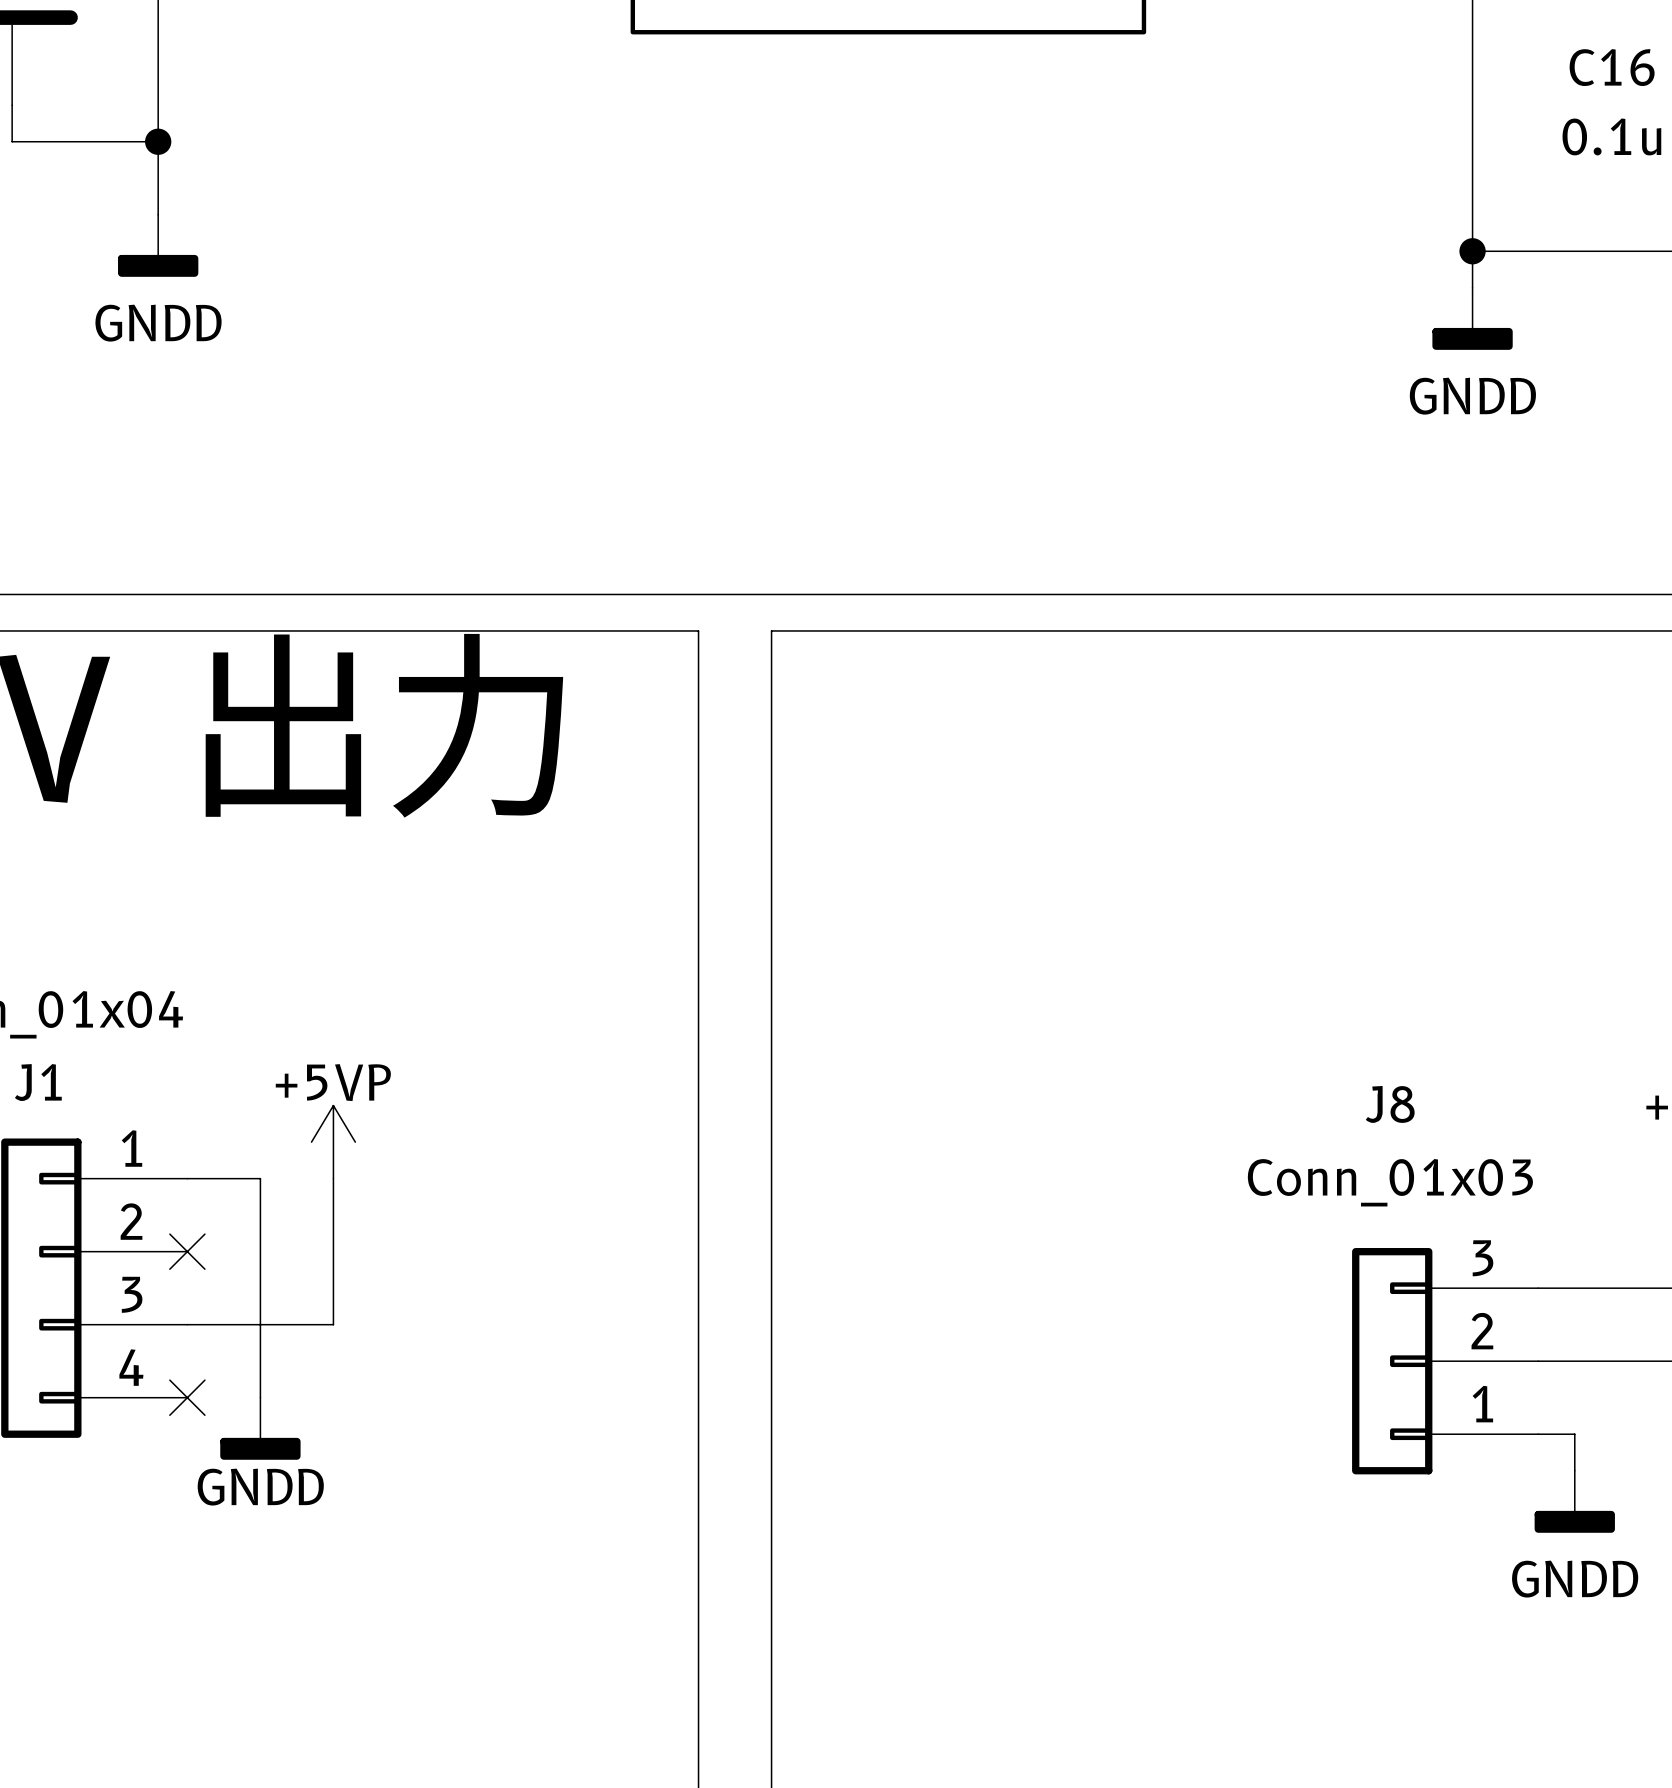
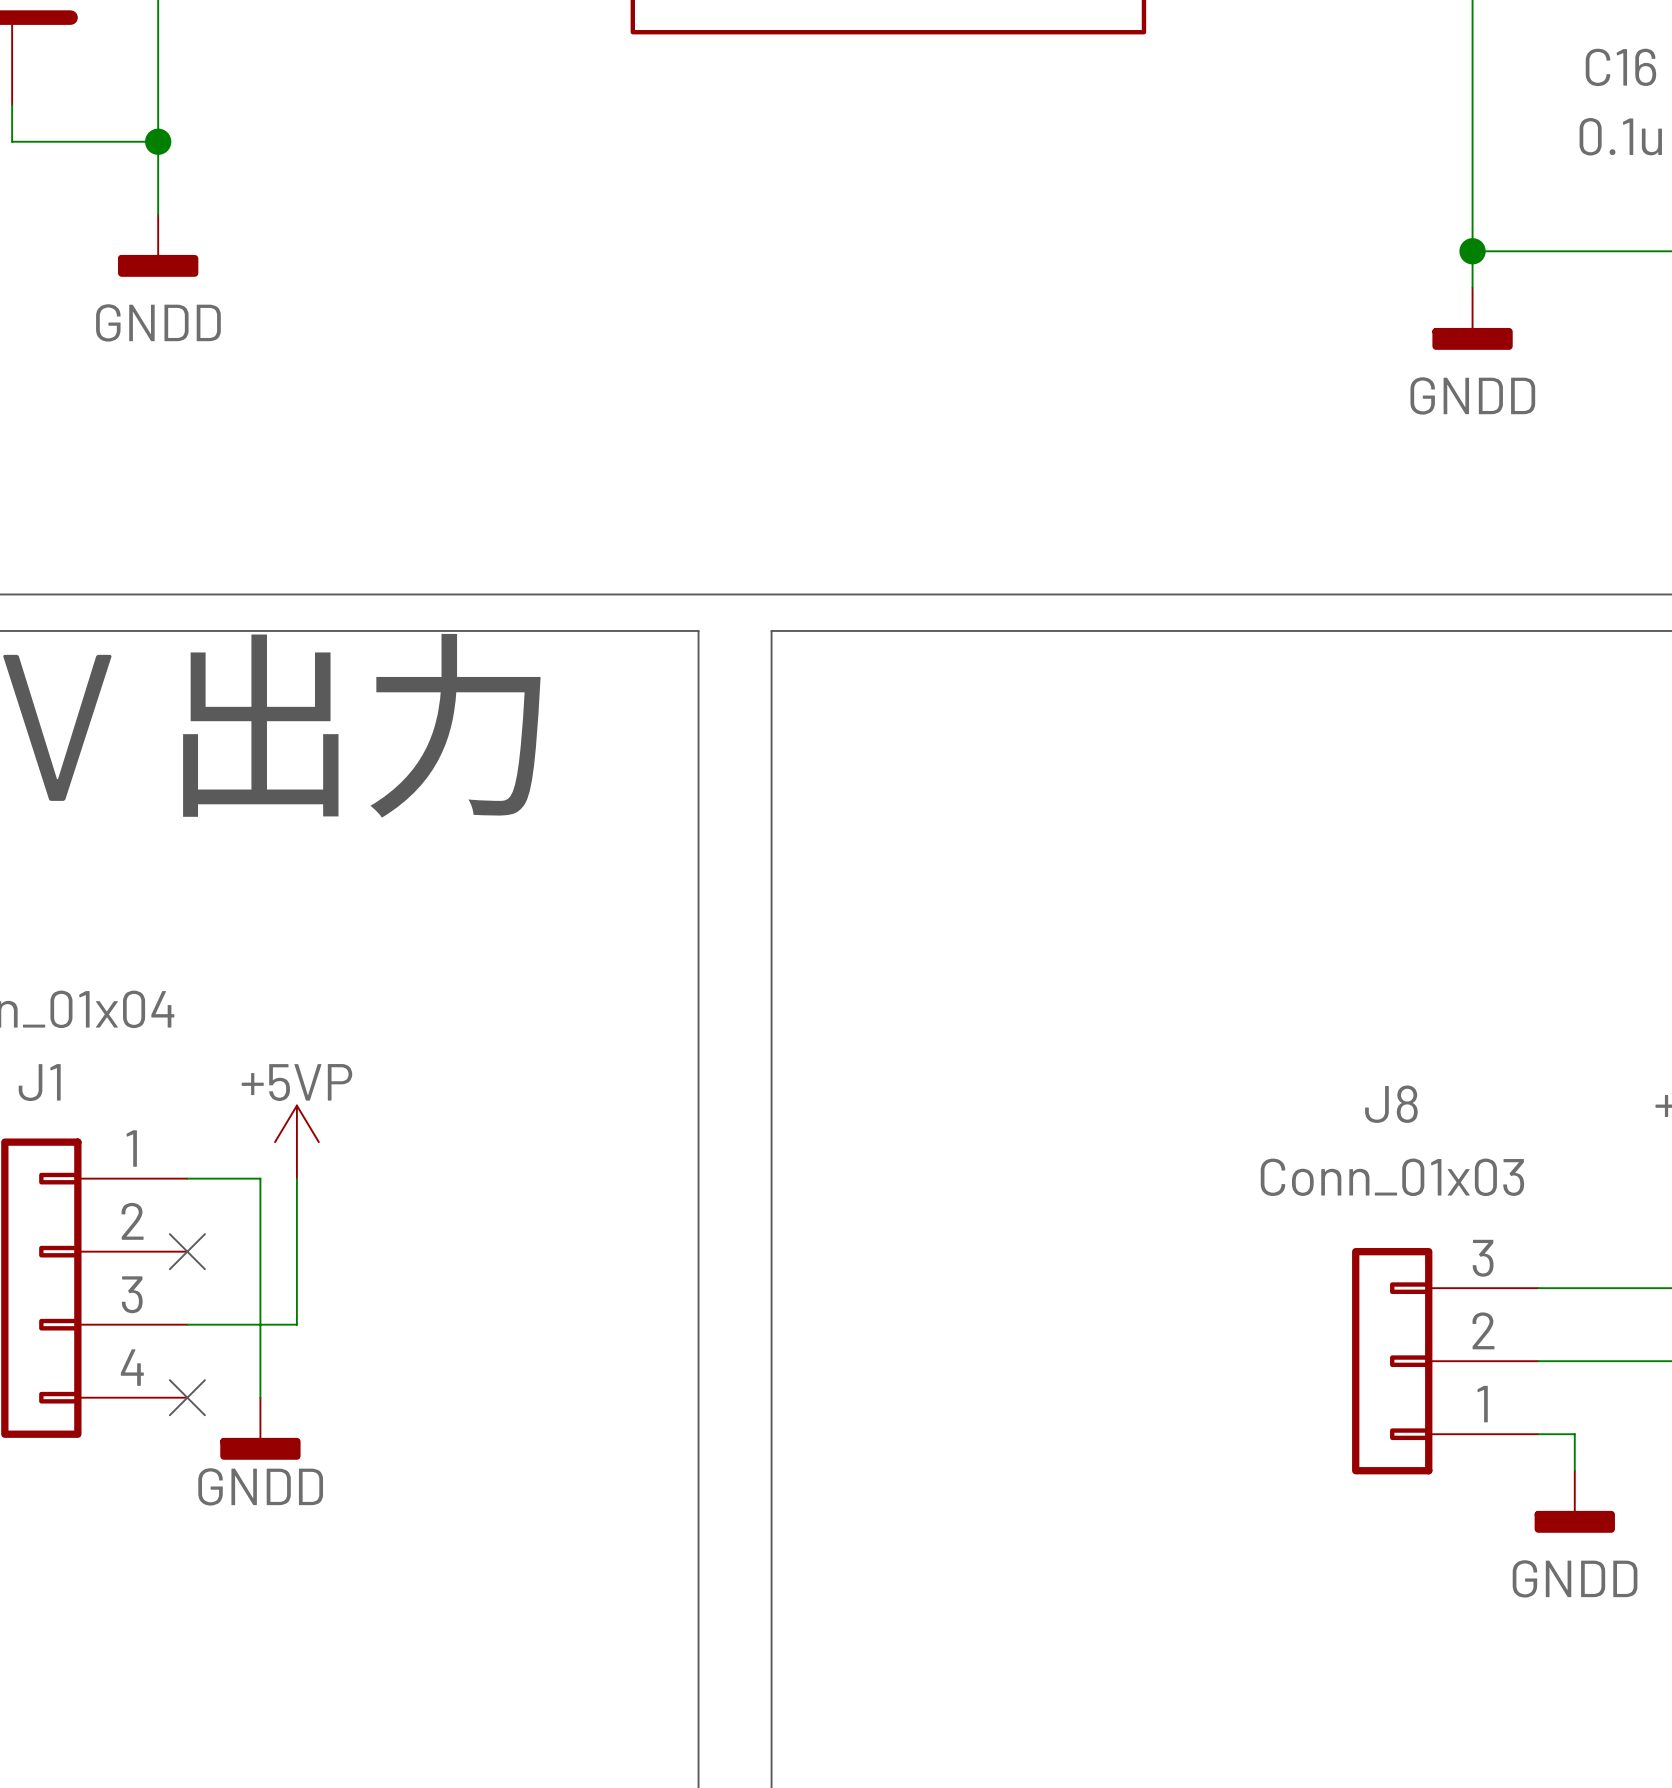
power symbol position: +5VP (333, 1142) -> +5VP (296, 1142)
wire: (333, 1178) (333, 1324) (296, 1324) -> (296, 1178) (296, 1324)

